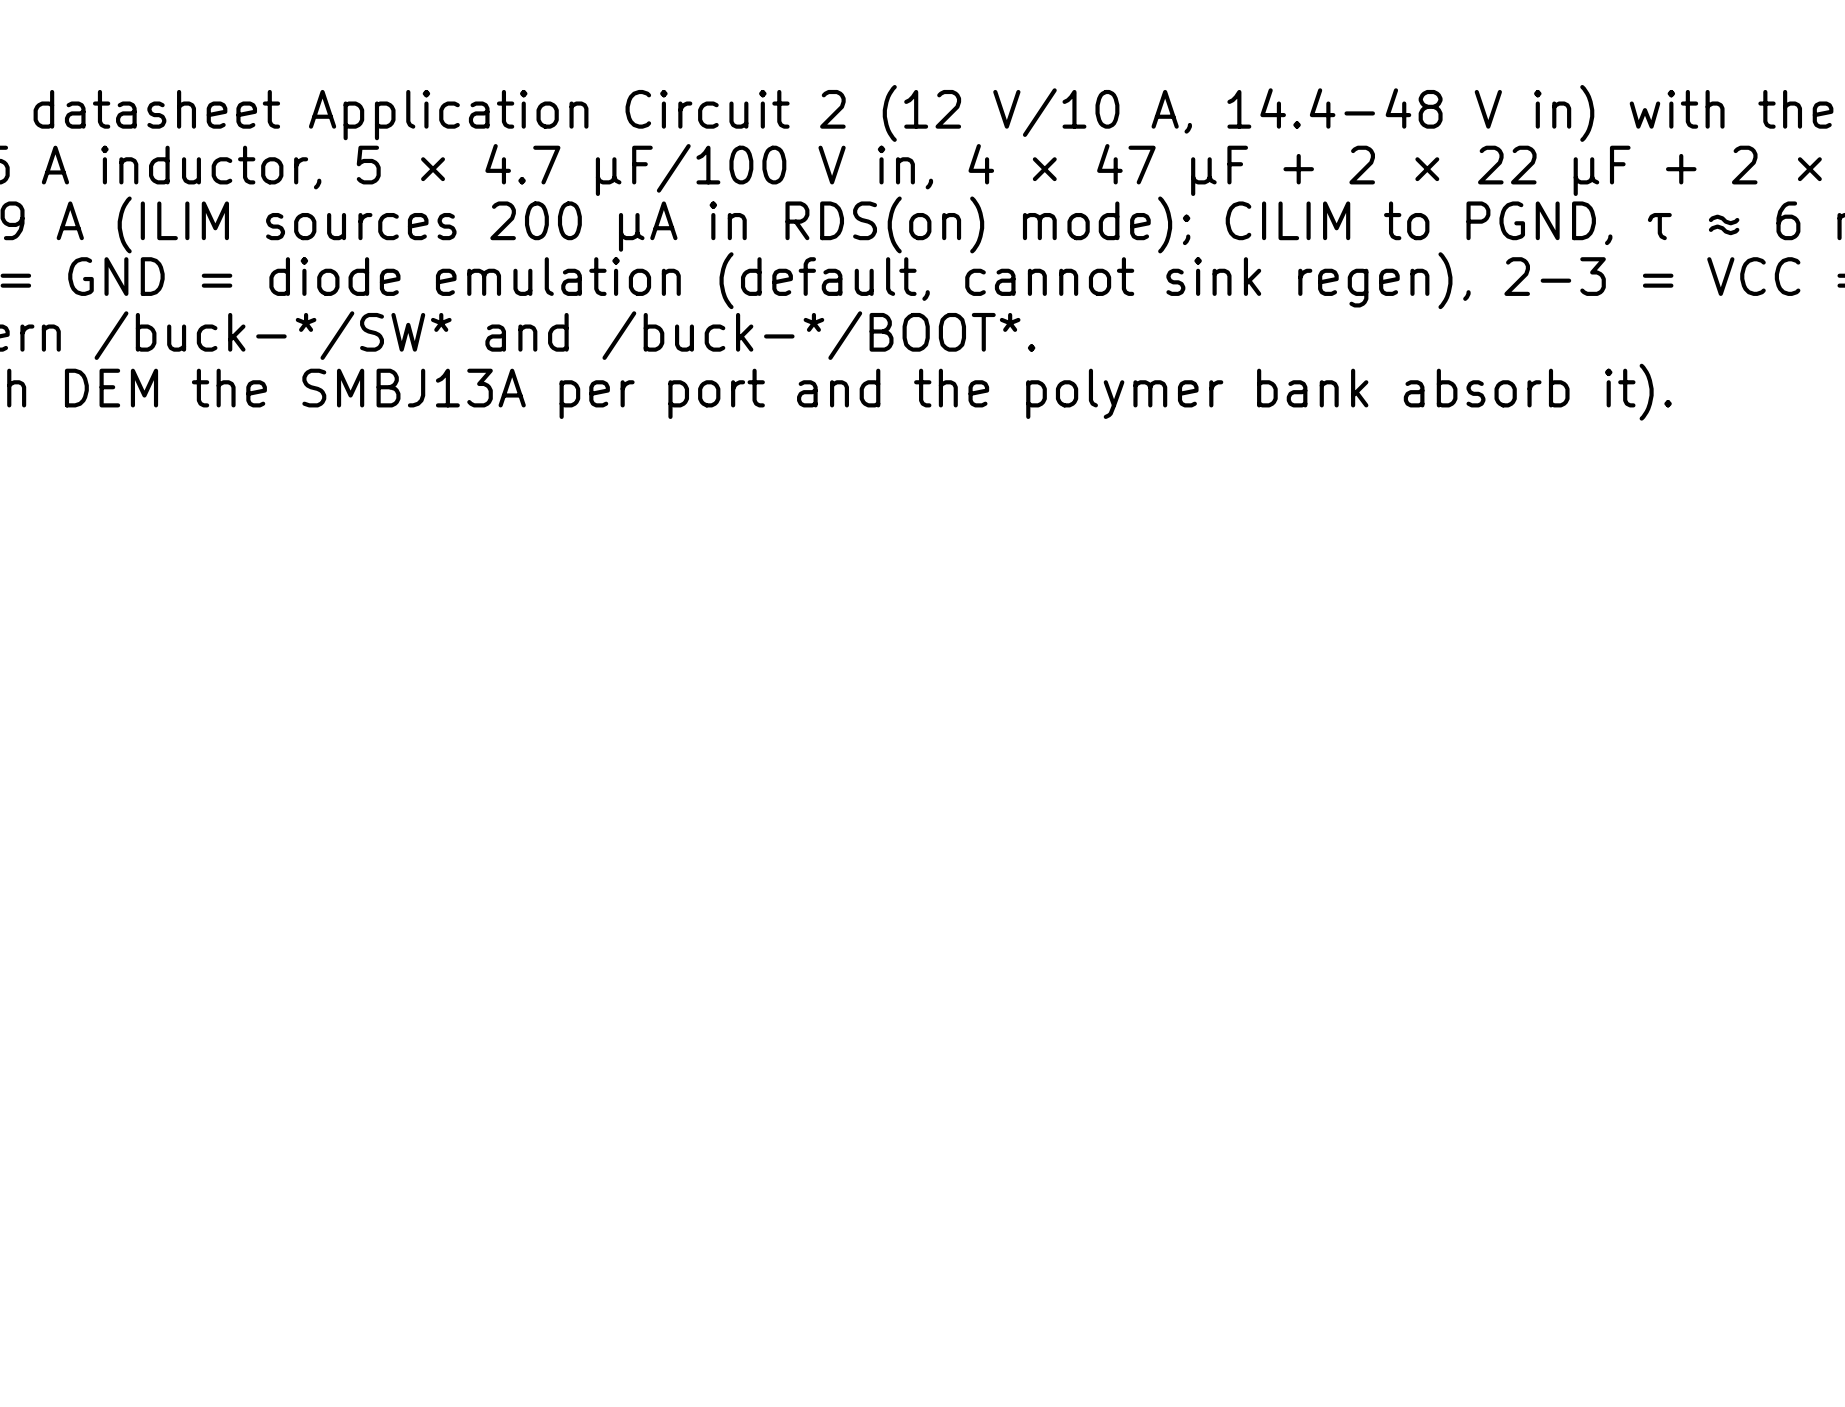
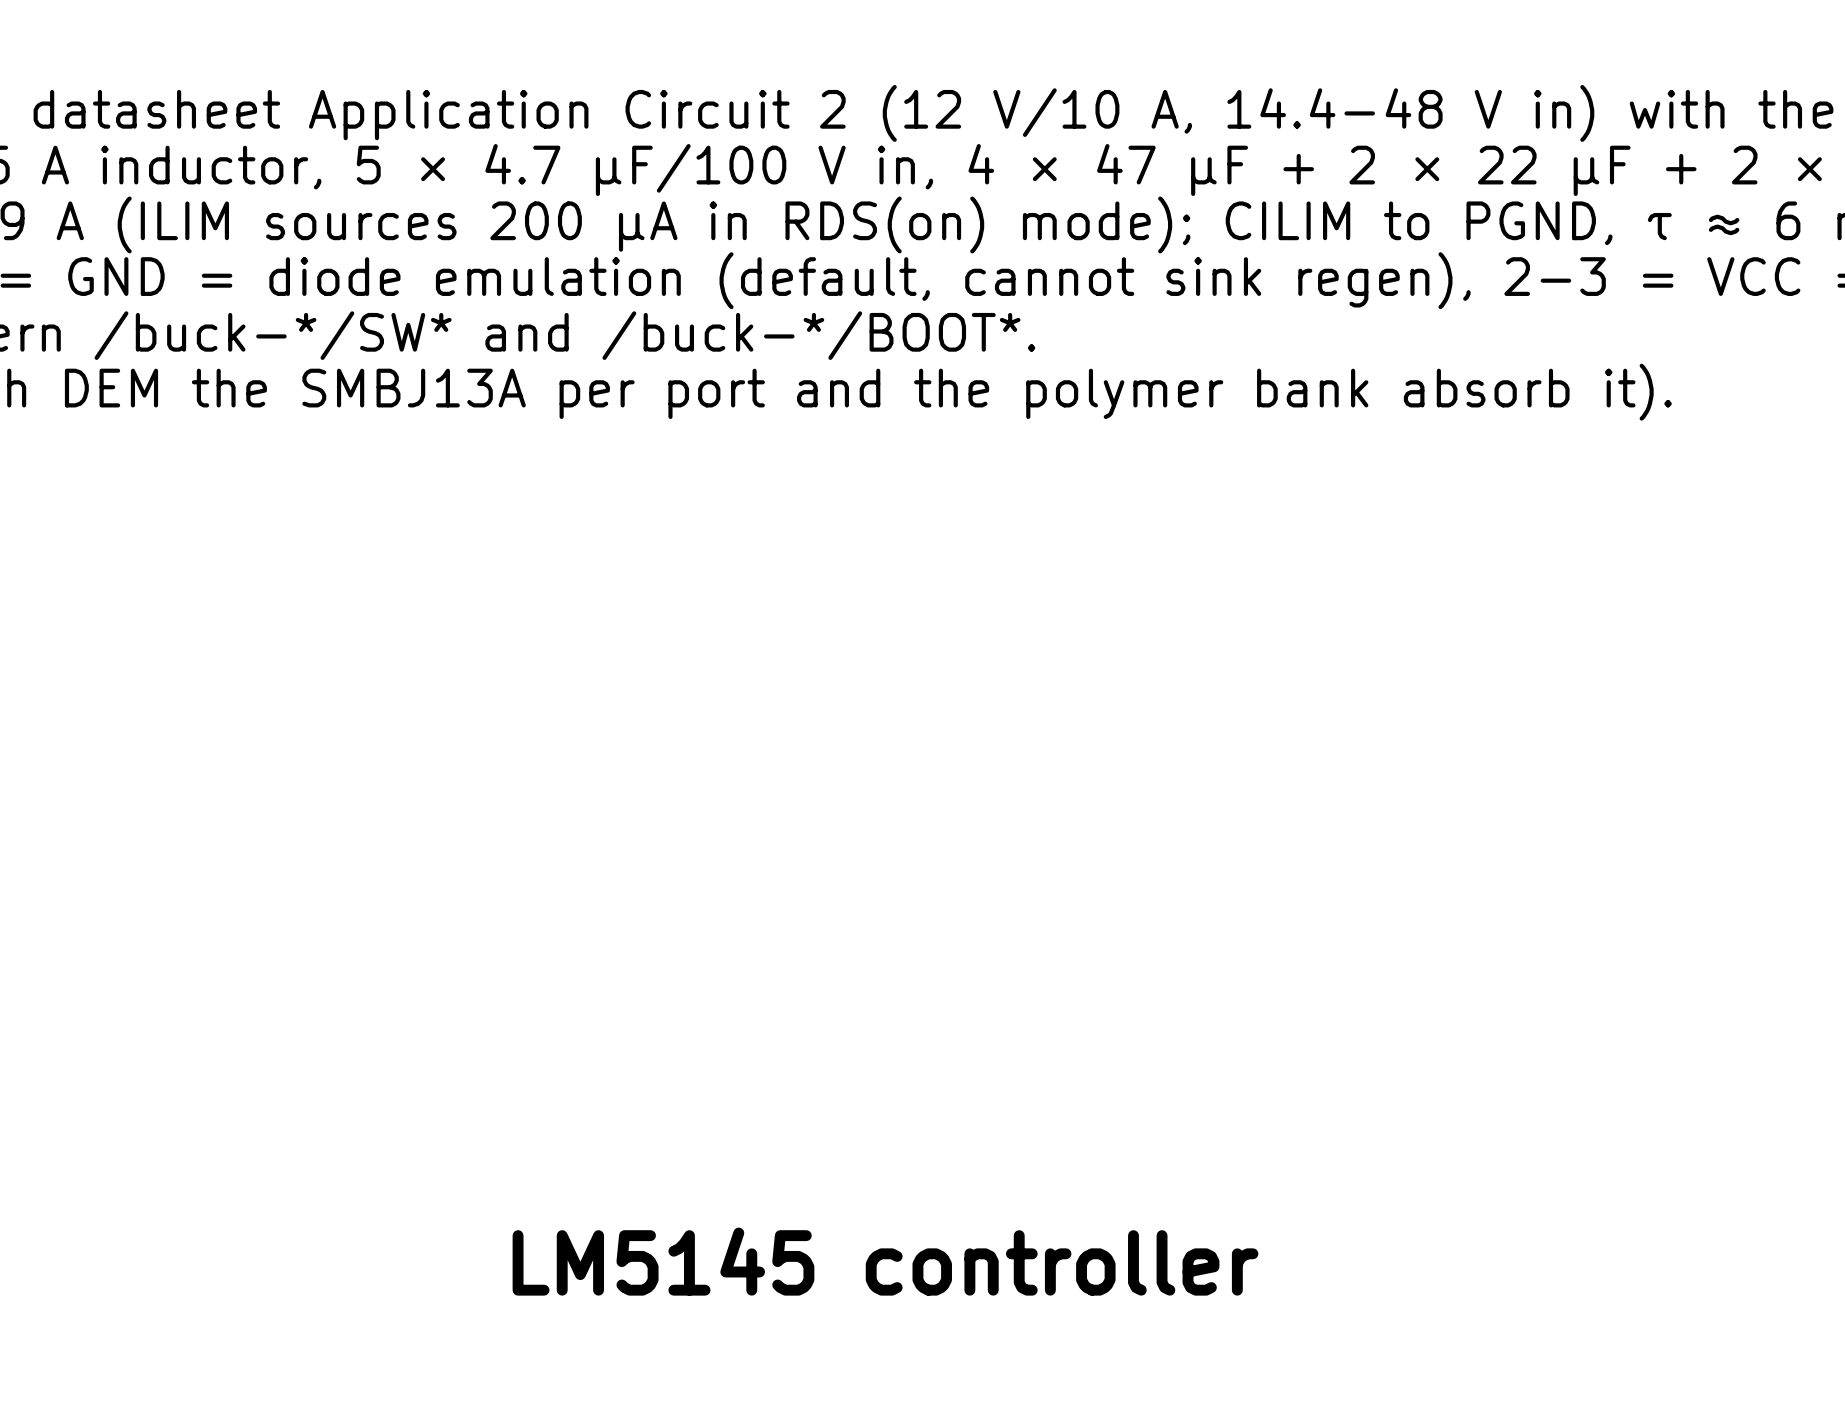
text: none -> LM5145 controller (885, 1261)

